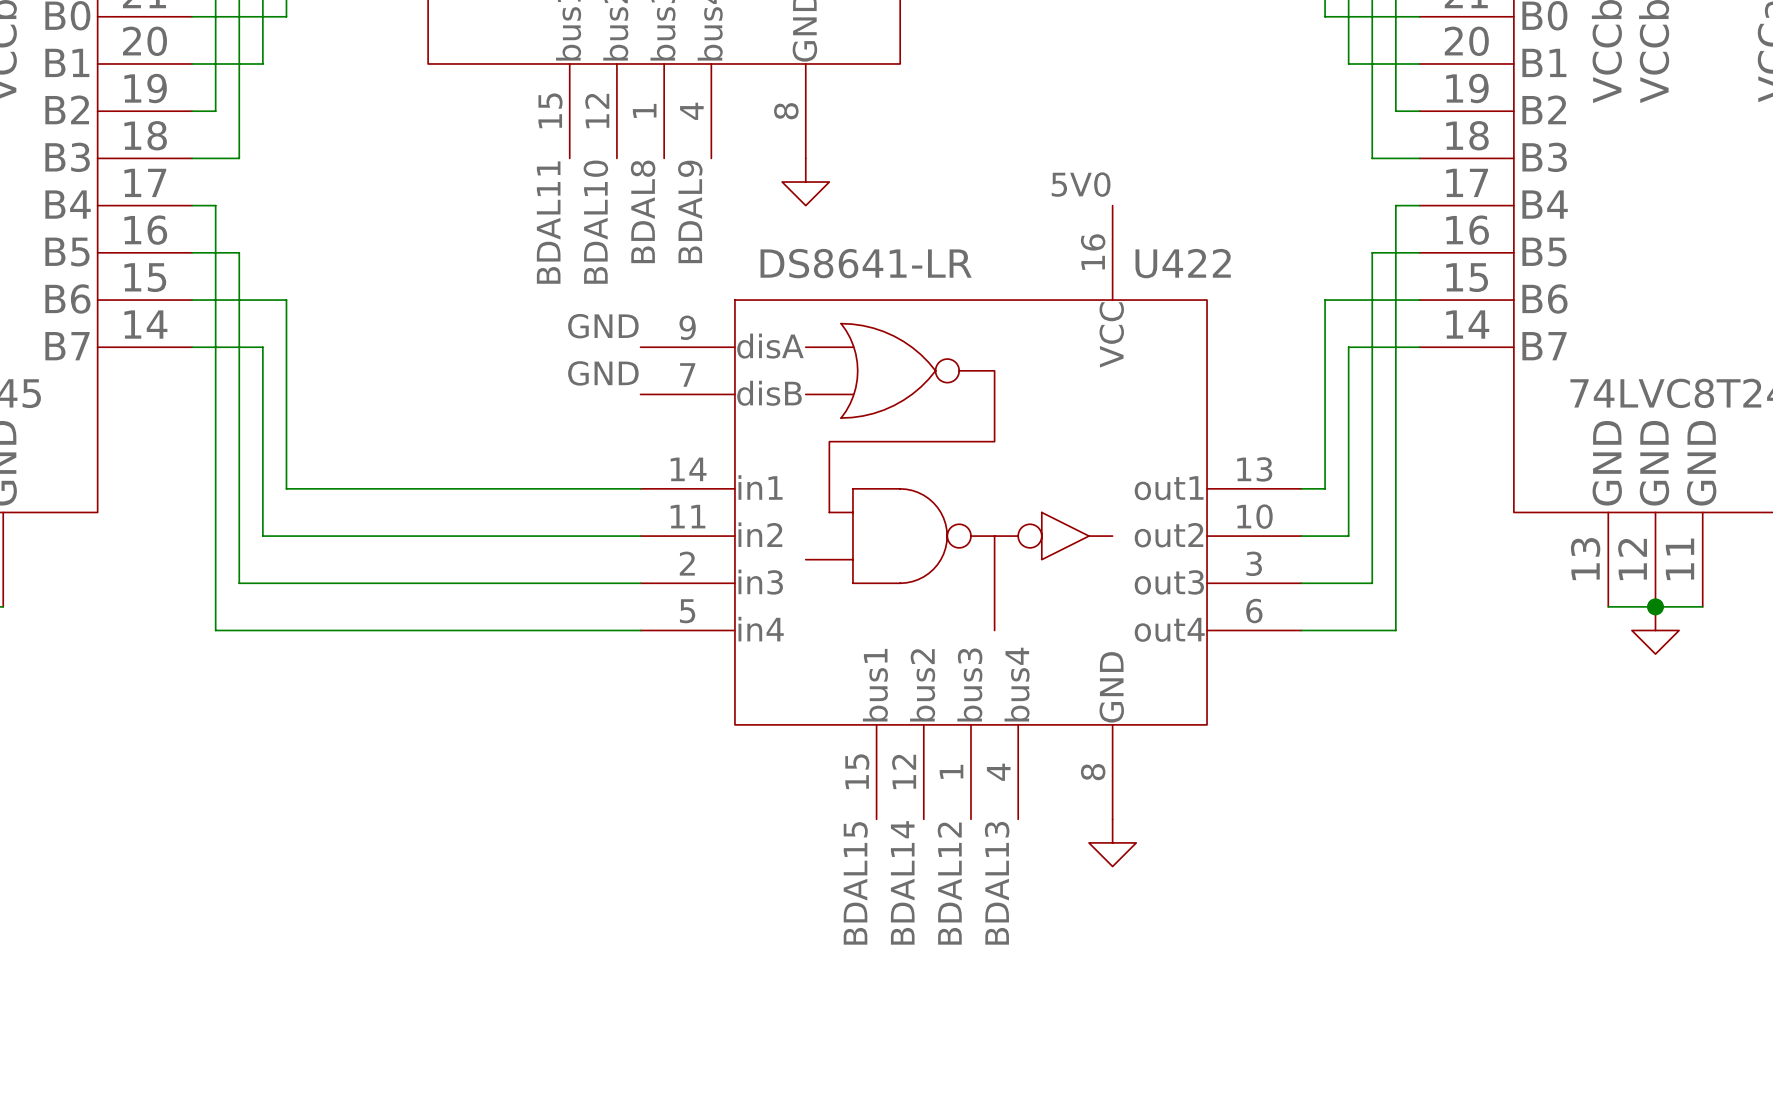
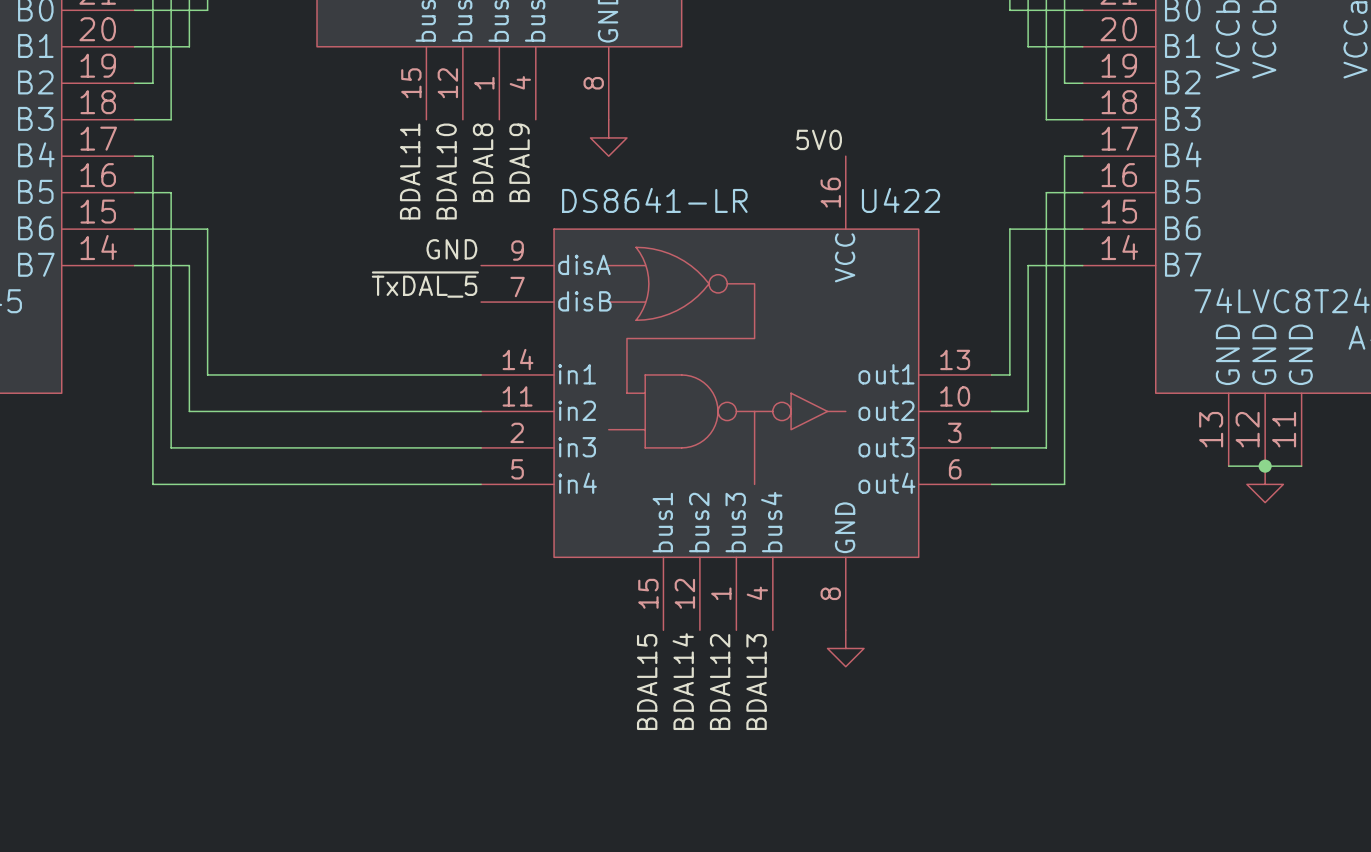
label: GND (603, 373) -> ~{TxDAL_5} (425, 284)

